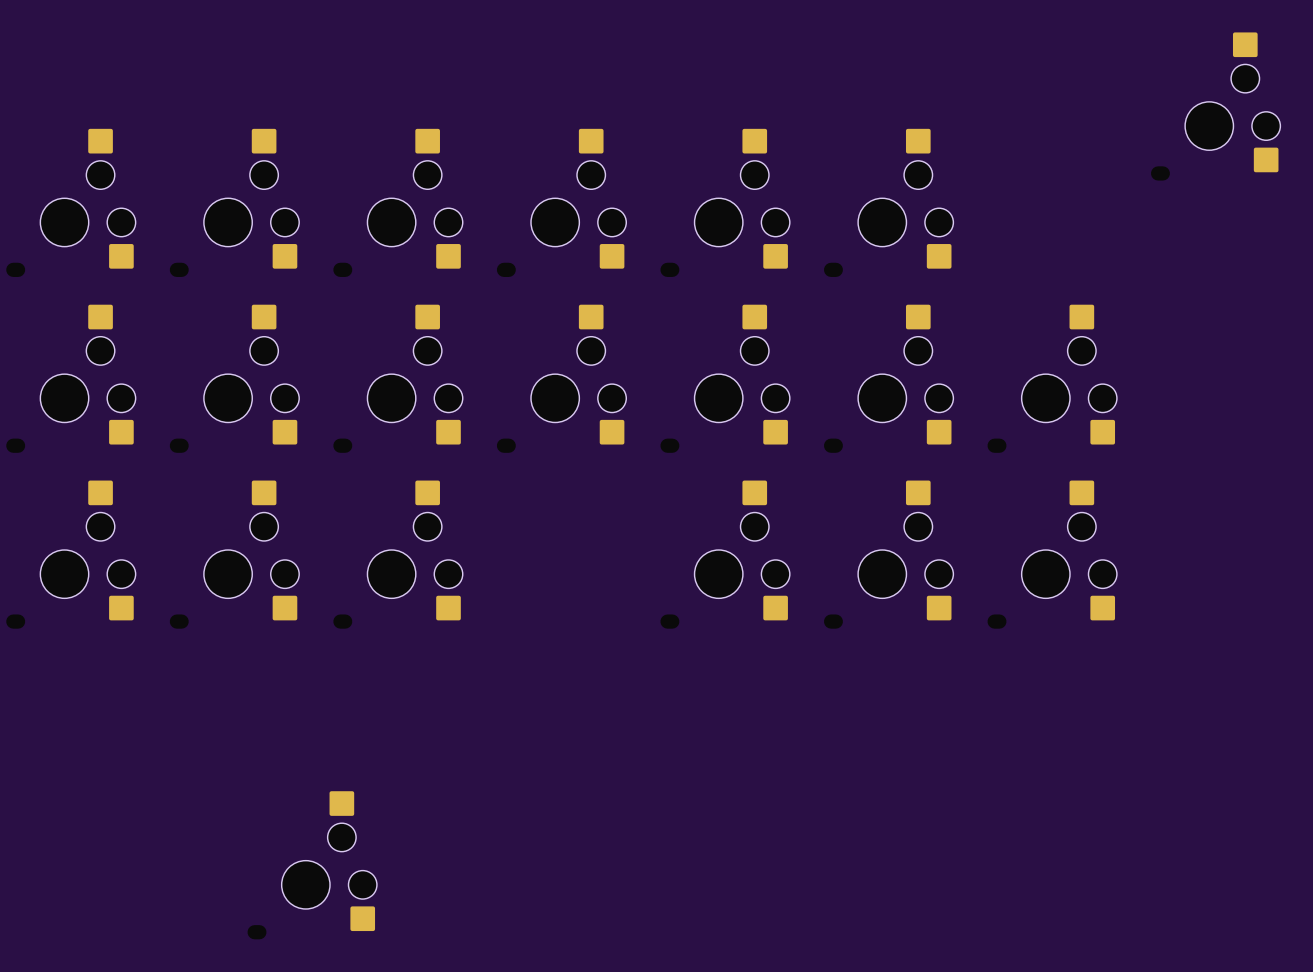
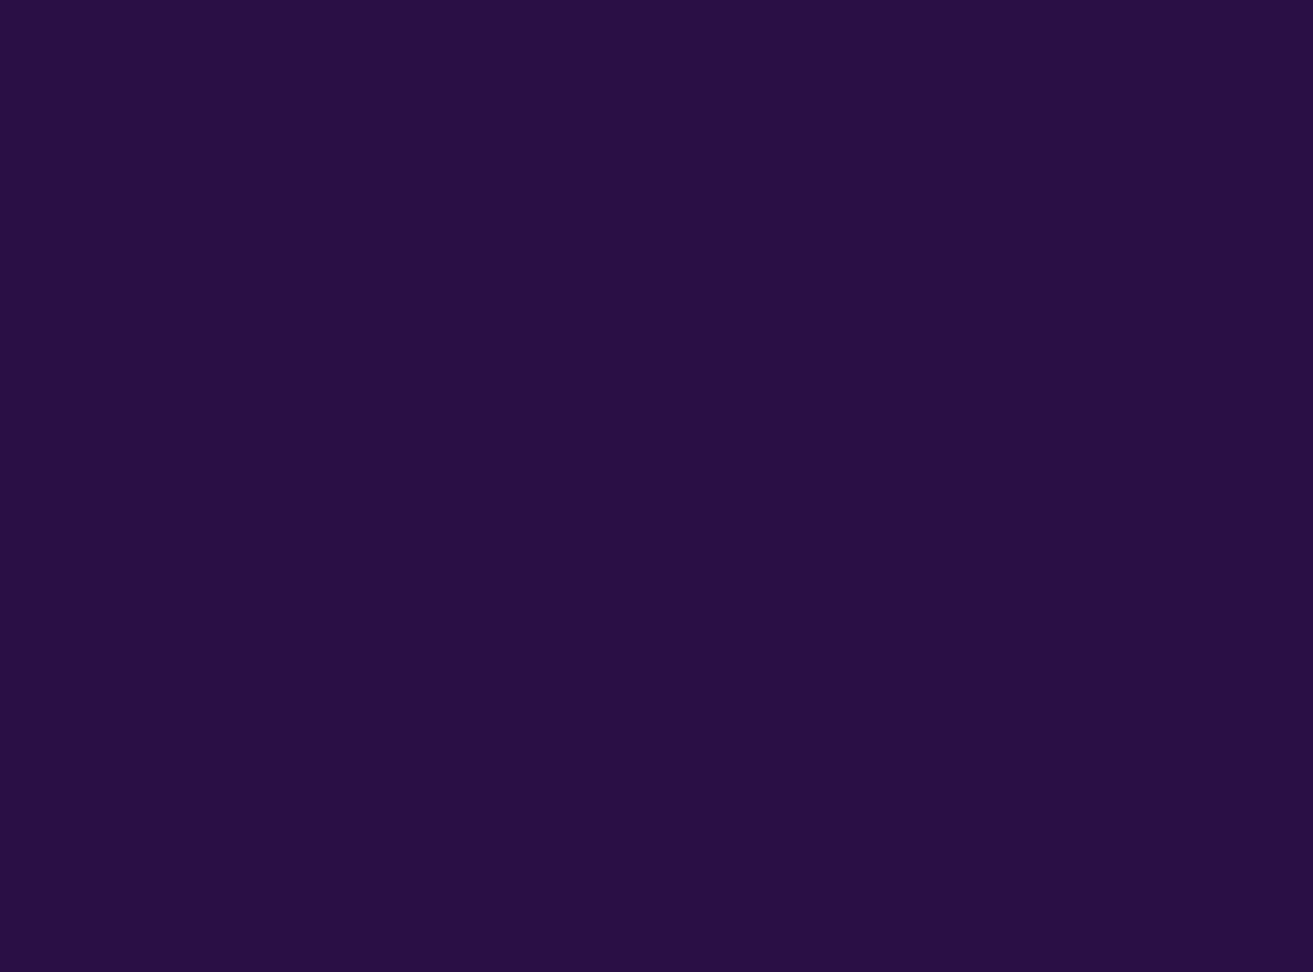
part: (1215, 106) -> none
part: (70, 202) -> none
part: (234, 202) -> none
part: (398, 202) -> none
part: (561, 202) -> none
part: (725, 202) -> none
part: (888, 202) -> none
part: (70, 378) -> none
part: (234, 378) -> none
part: (398, 378) -> none
part: (561, 378) -> none
part: (725, 378) -> none
part: (888, 378) -> none
part: (1052, 378) -> none
part: (70, 554) -> none
part: (234, 554) -> none
part: (398, 554) -> none
part: (725, 554) -> none
part: (888, 554) -> none
part: (1052, 554) -> none
part: (312, 865) -> none

